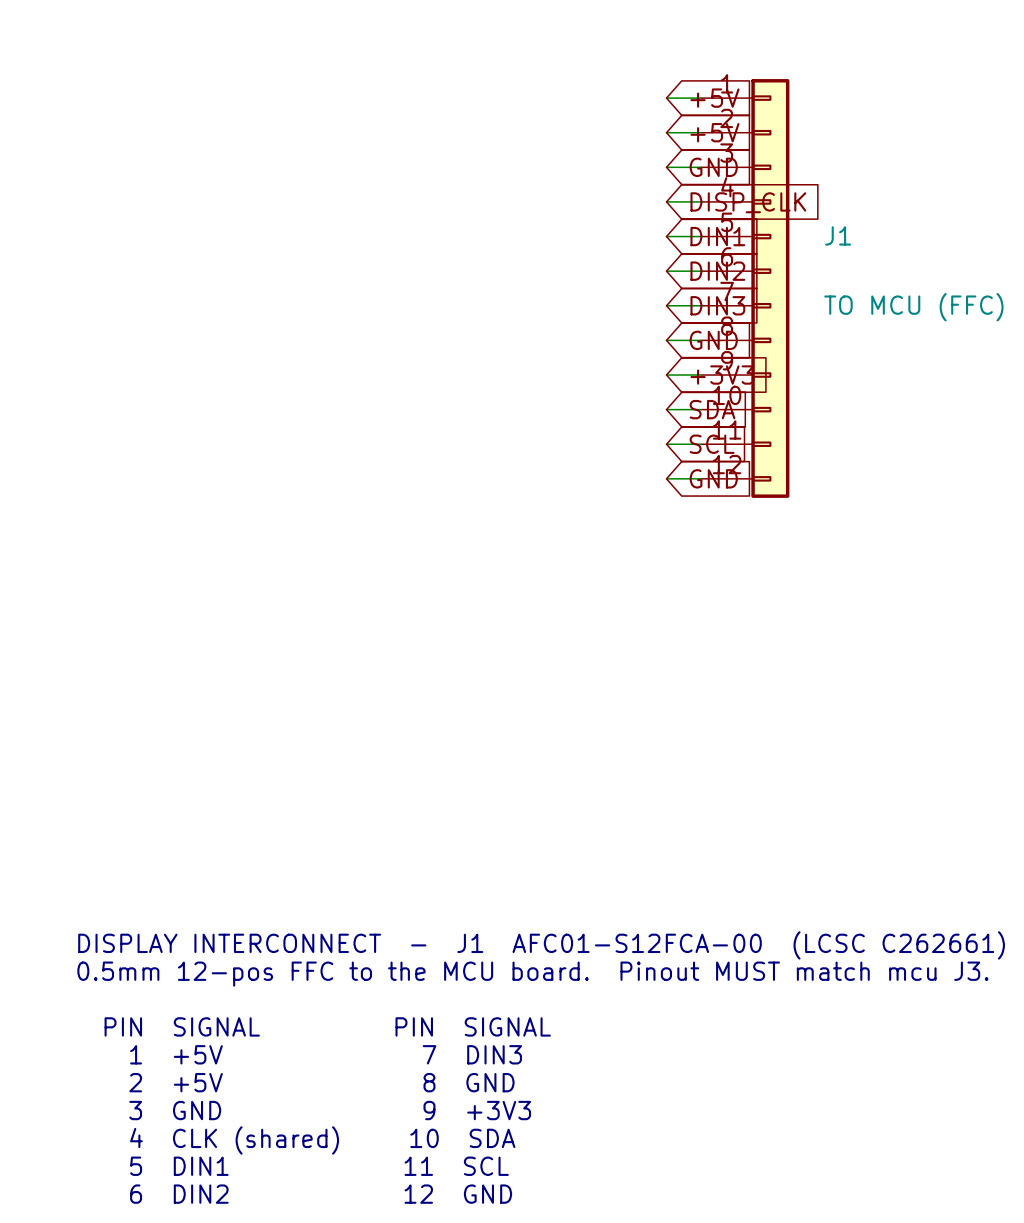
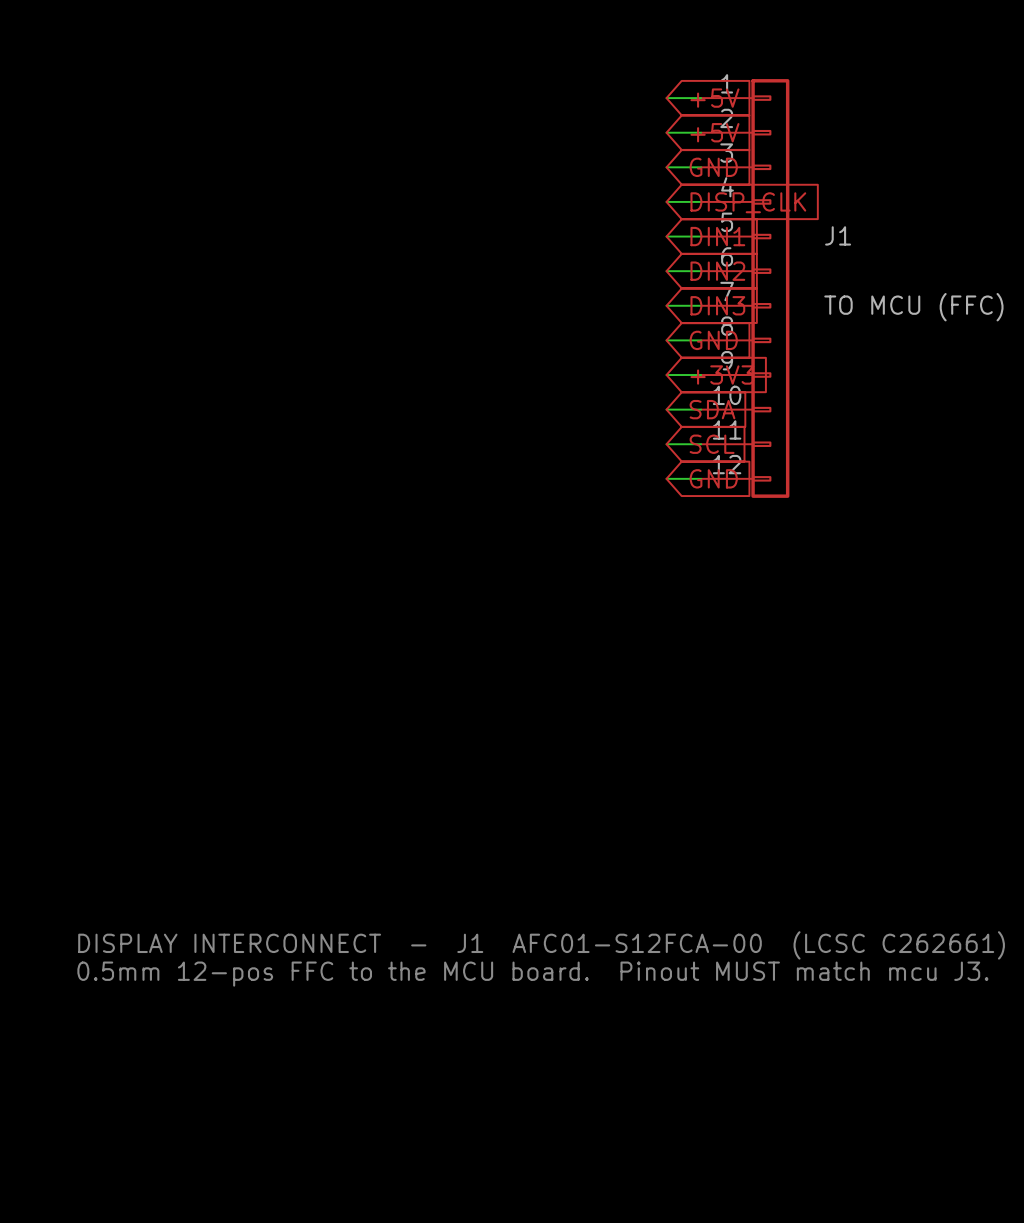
text: PIN SIGNAL PIN SIGNAL (327, 1026) -> none
text: 1 +5V 7 DIN3 (326, 1054) -> none
text: 2 +5V 8 GND (321, 1082) -> none
text: 3 GND 9 +3V3 (330, 1110) -> none
text: 4 CLK (shared) 10 SDA (322, 1140) -> none
text: 5 DIN1 11 SCL (319, 1166) -> none
text: 6 DIN2 12 GND (321, 1194) -> none

